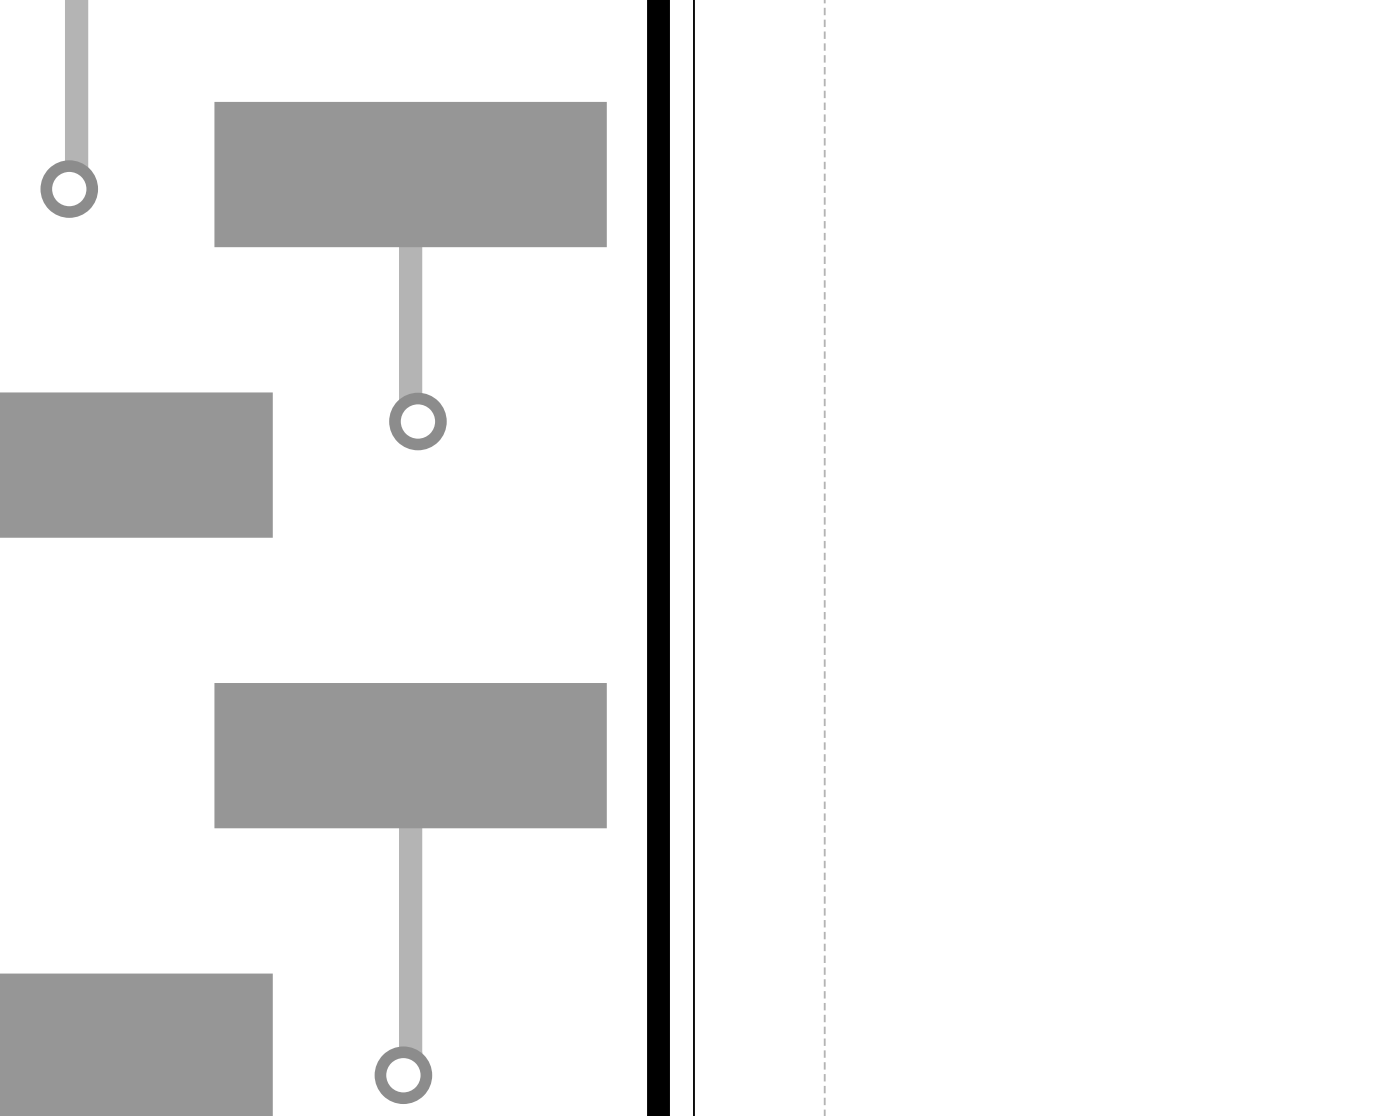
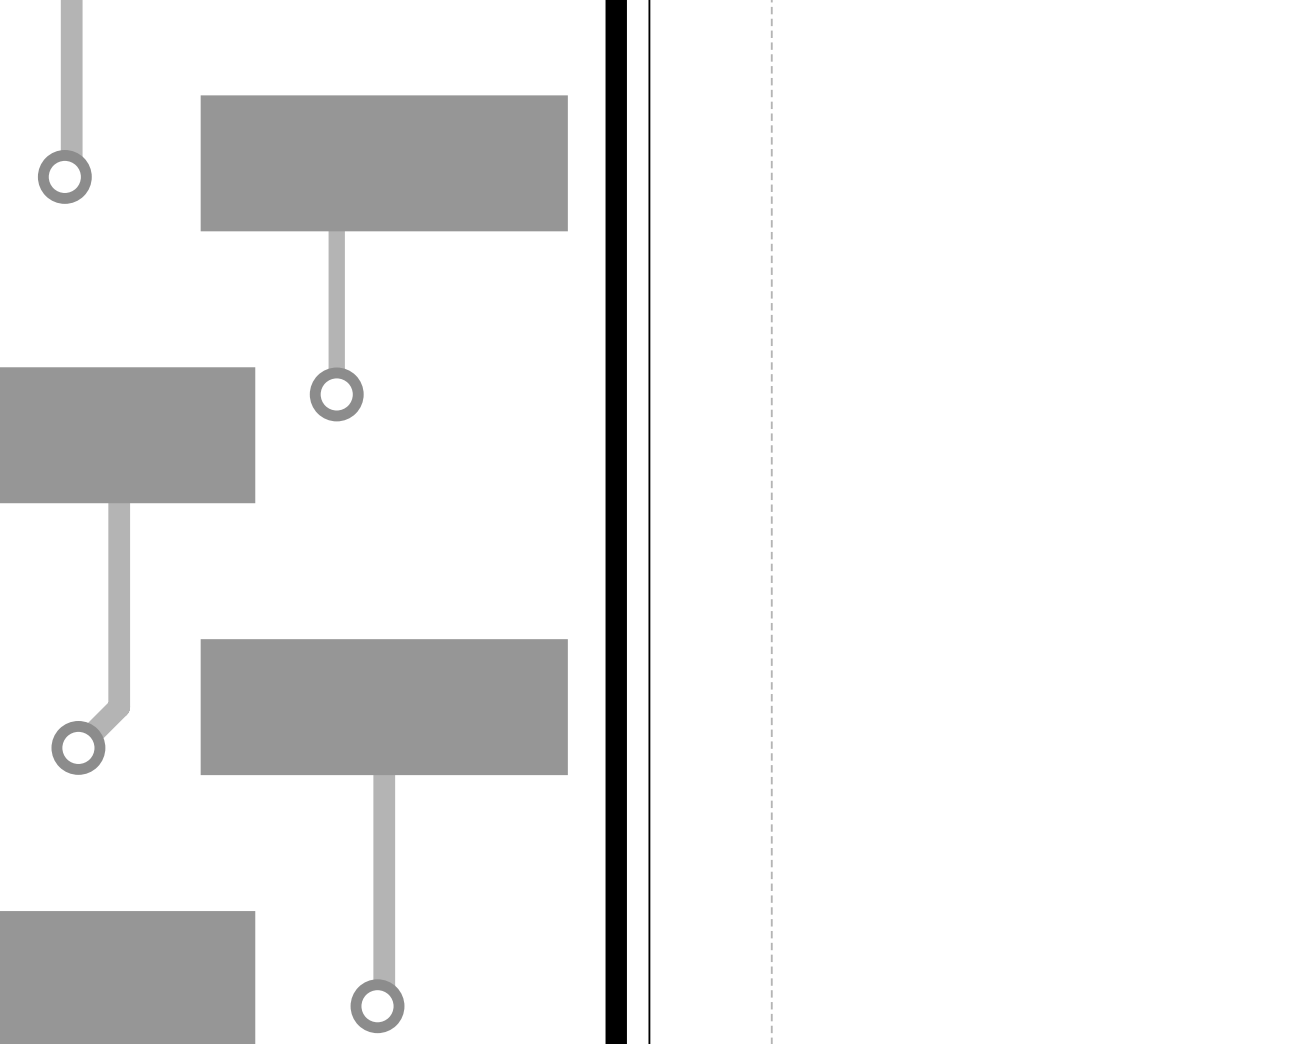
track: (410, 174) (410, 414) (417, 421) -> (384, 163) (336, 210) (336, 394)
via position: (417, 421) -> (336, 394)
track: none -> (71, 435) (119, 482) (119, 707) (78, 747)
via: none -> (78, 747)

